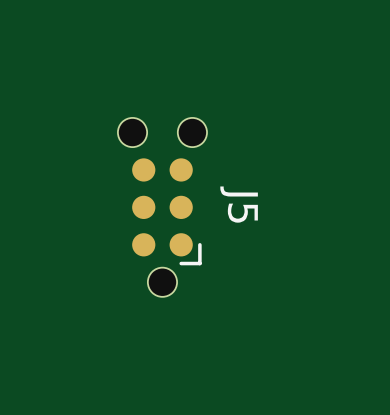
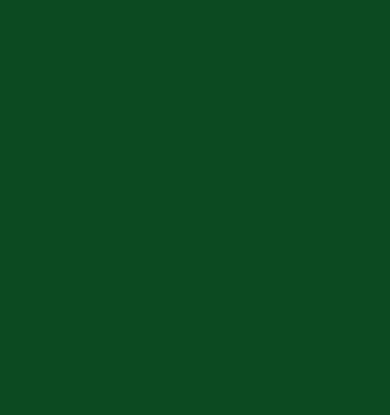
J5: (162, 207) -> none

